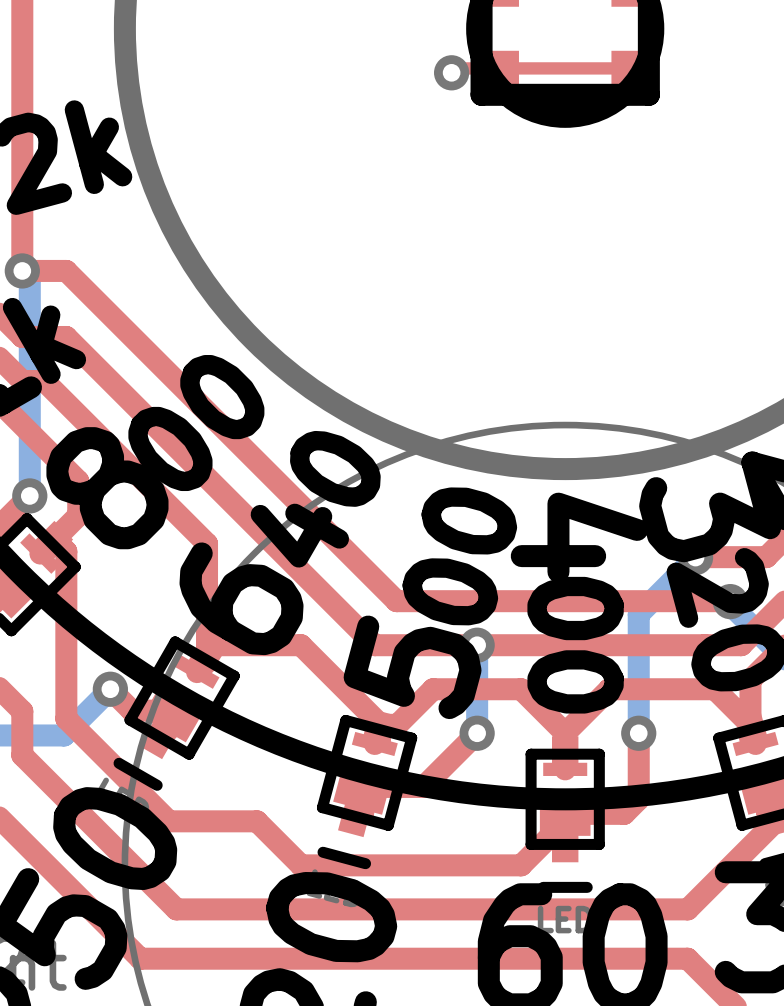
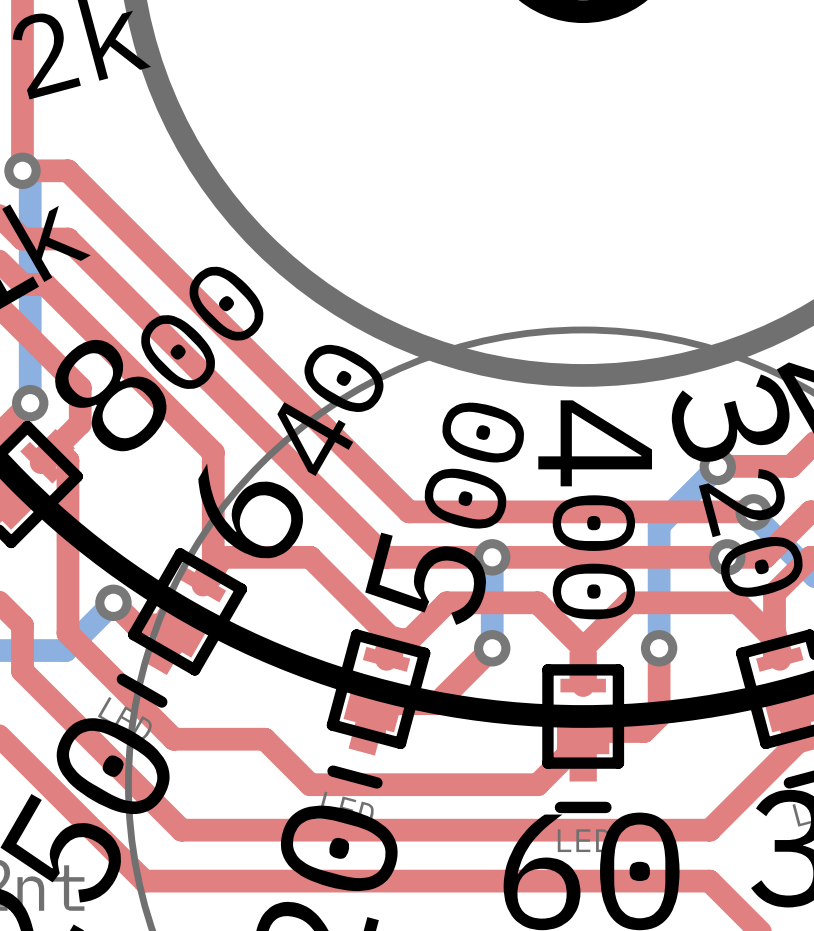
via: none -> (727, 557)

